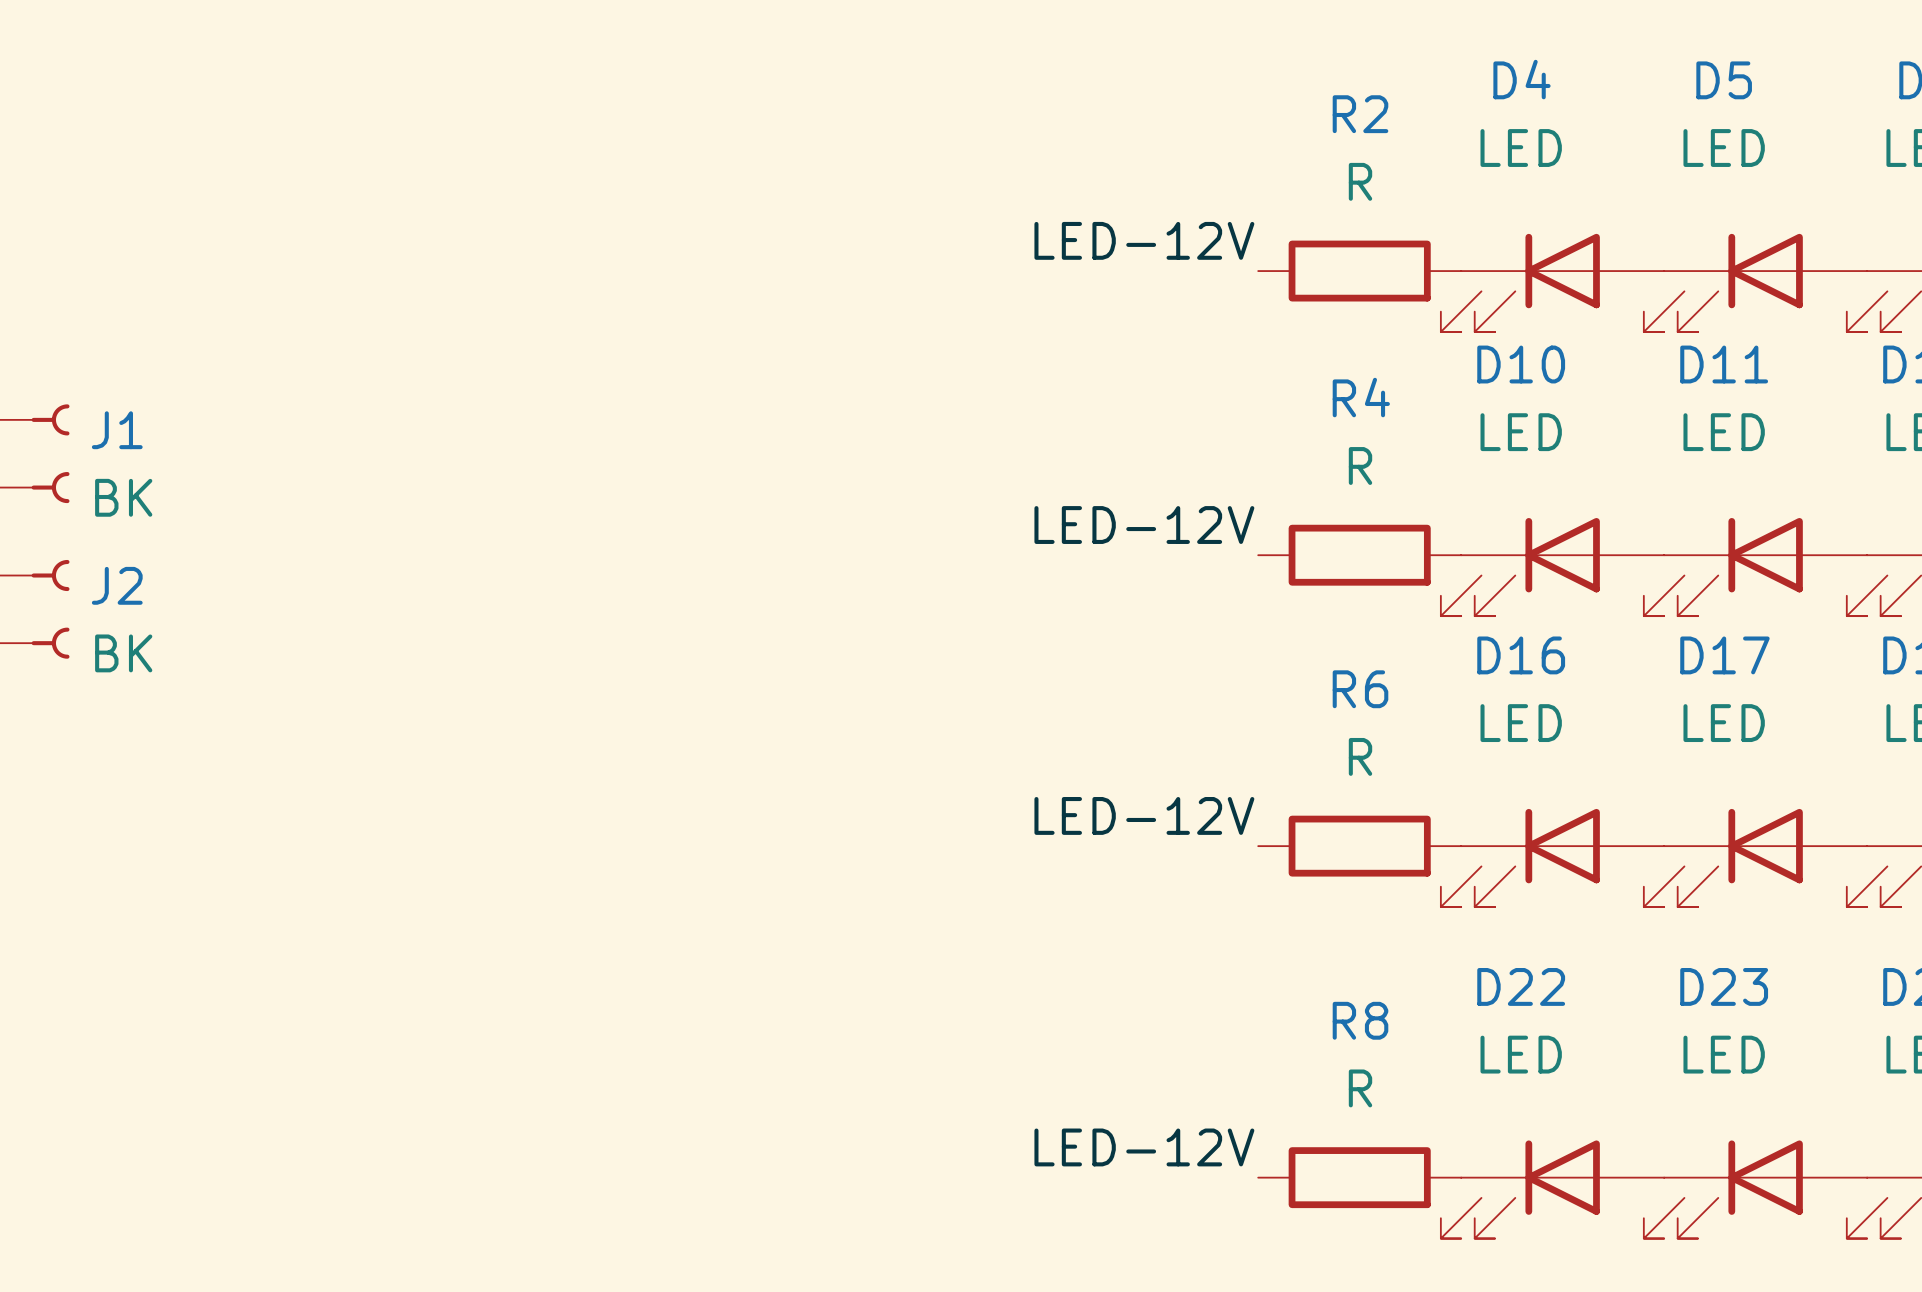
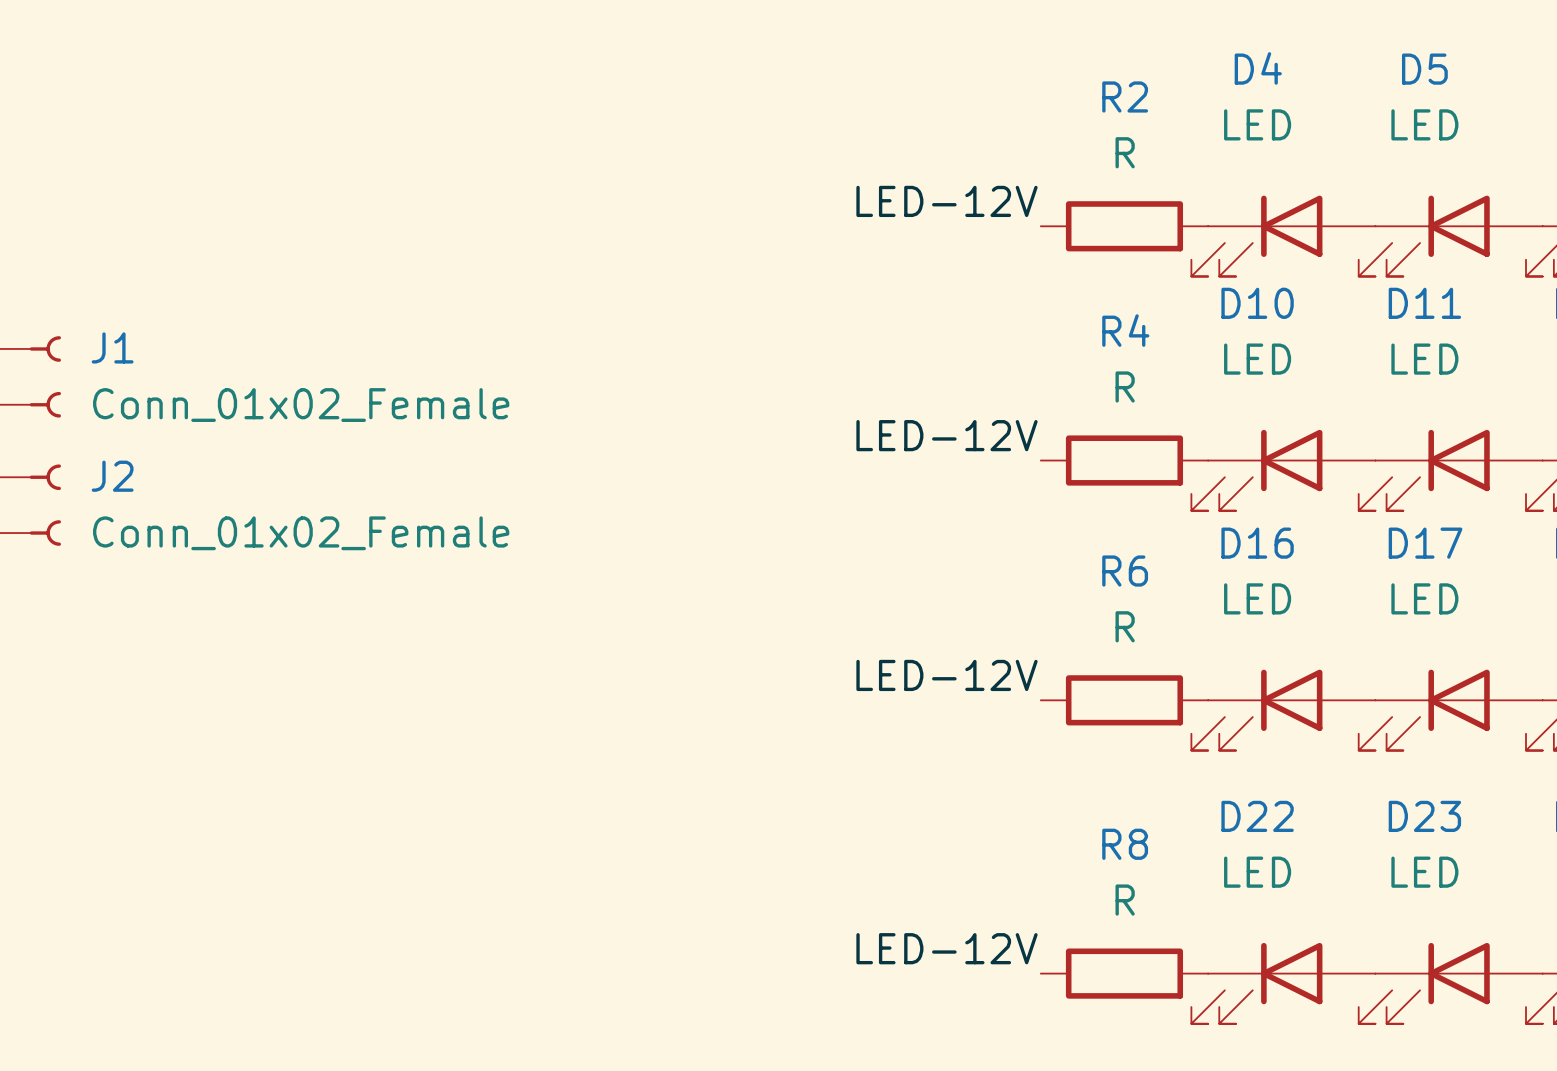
J1 name position: J1 (117, 430) -> J1 (112, 347)
J1 value: BK (123, 497) -> Conn_01x02_Female (301, 405)
J2 name position: J2 (117, 585) -> J2 (112, 476)
J2 value: BK (123, 653) -> Conn_01x02_Female (301, 533)

